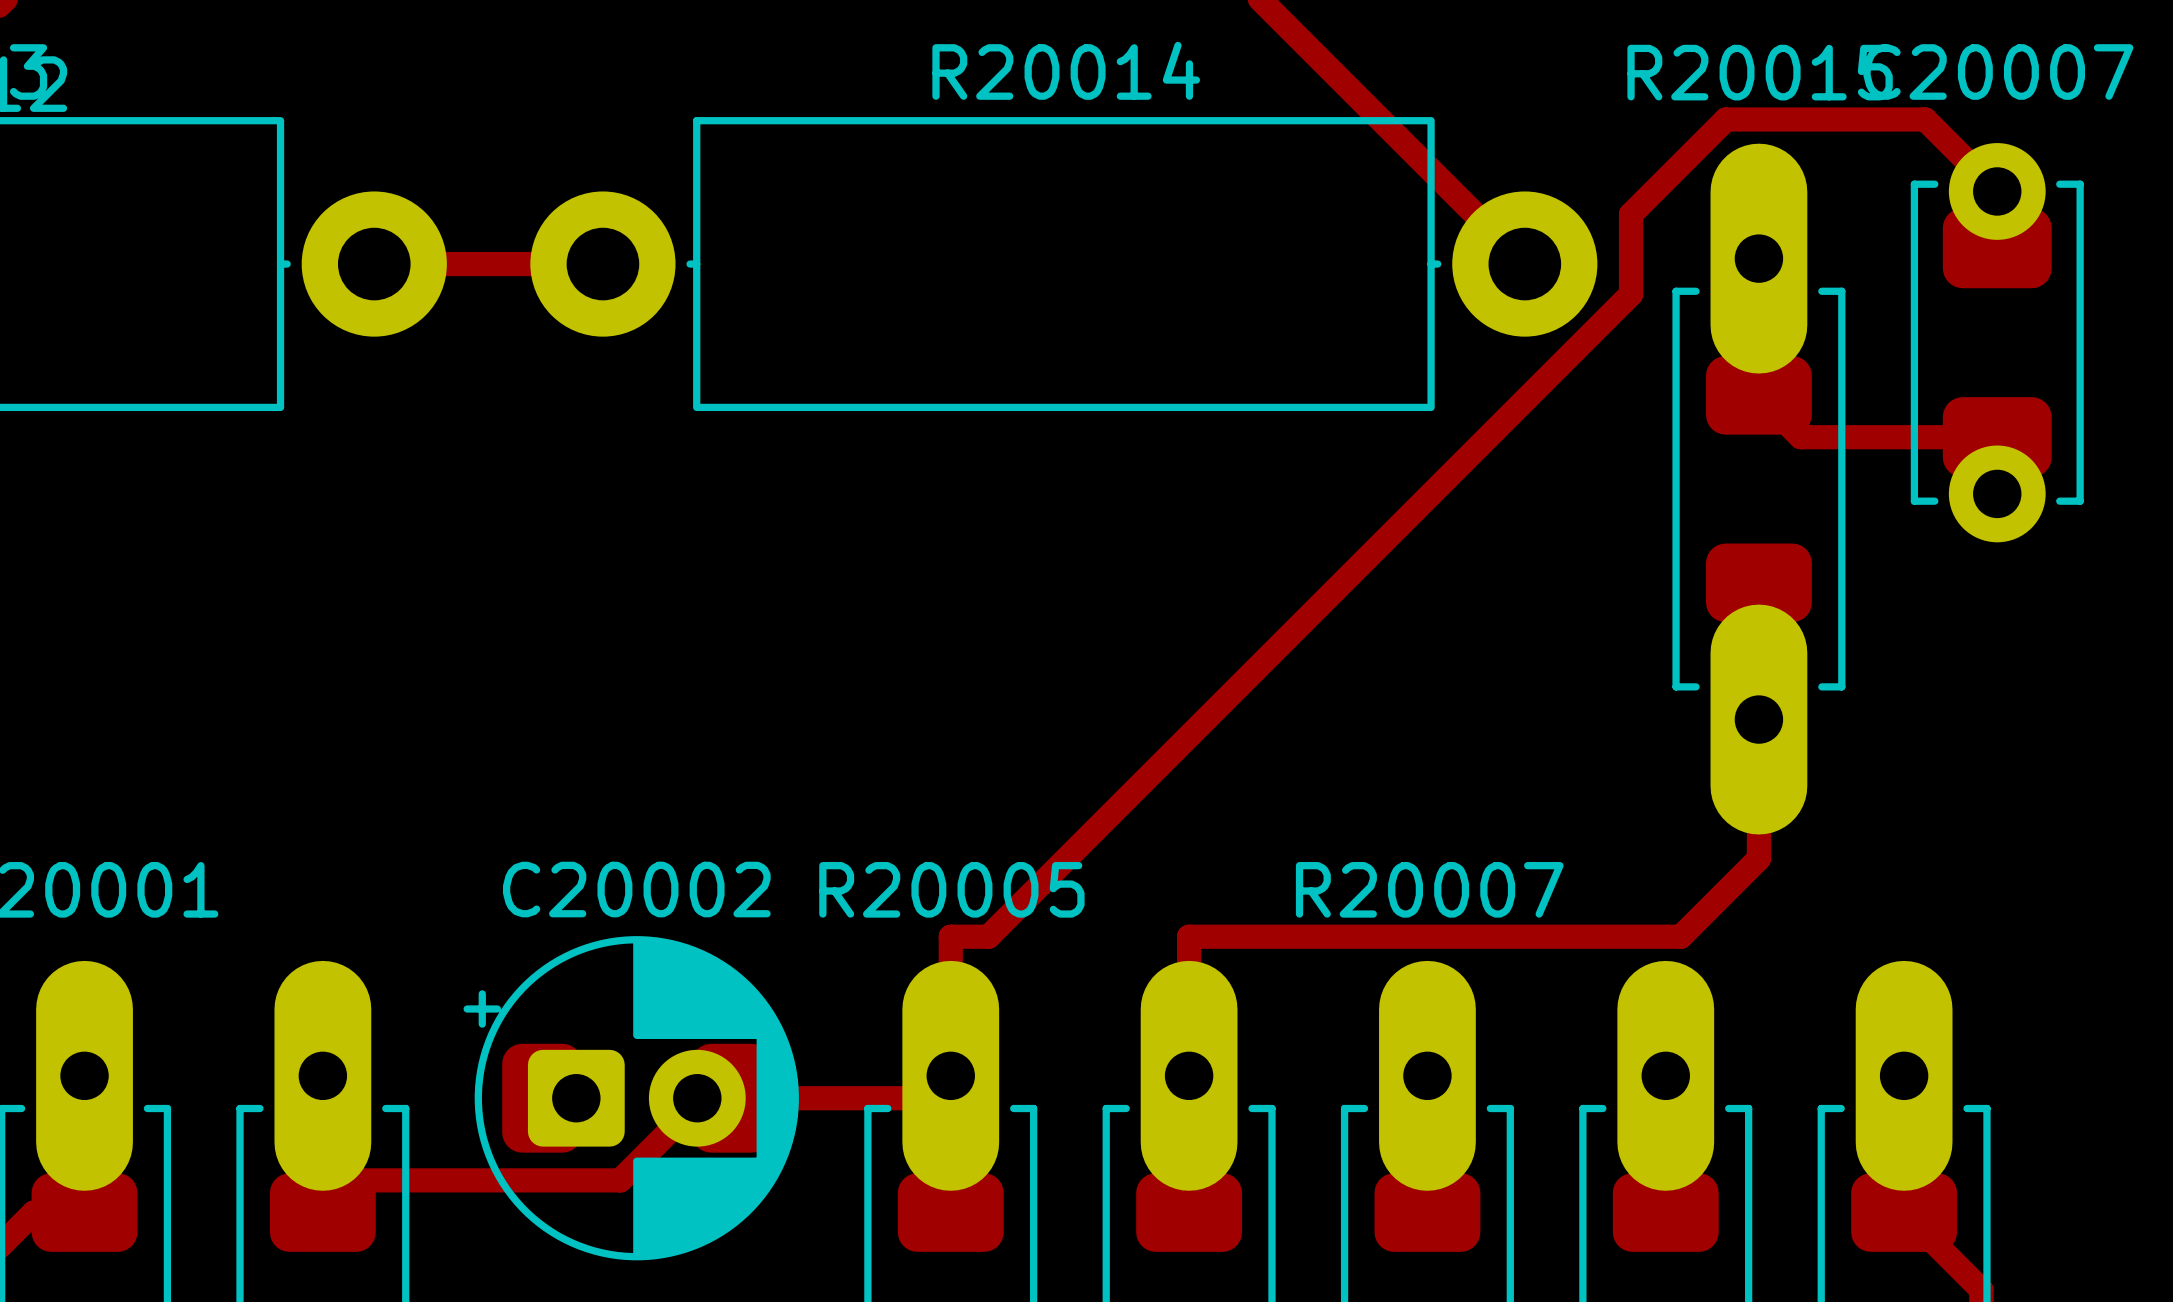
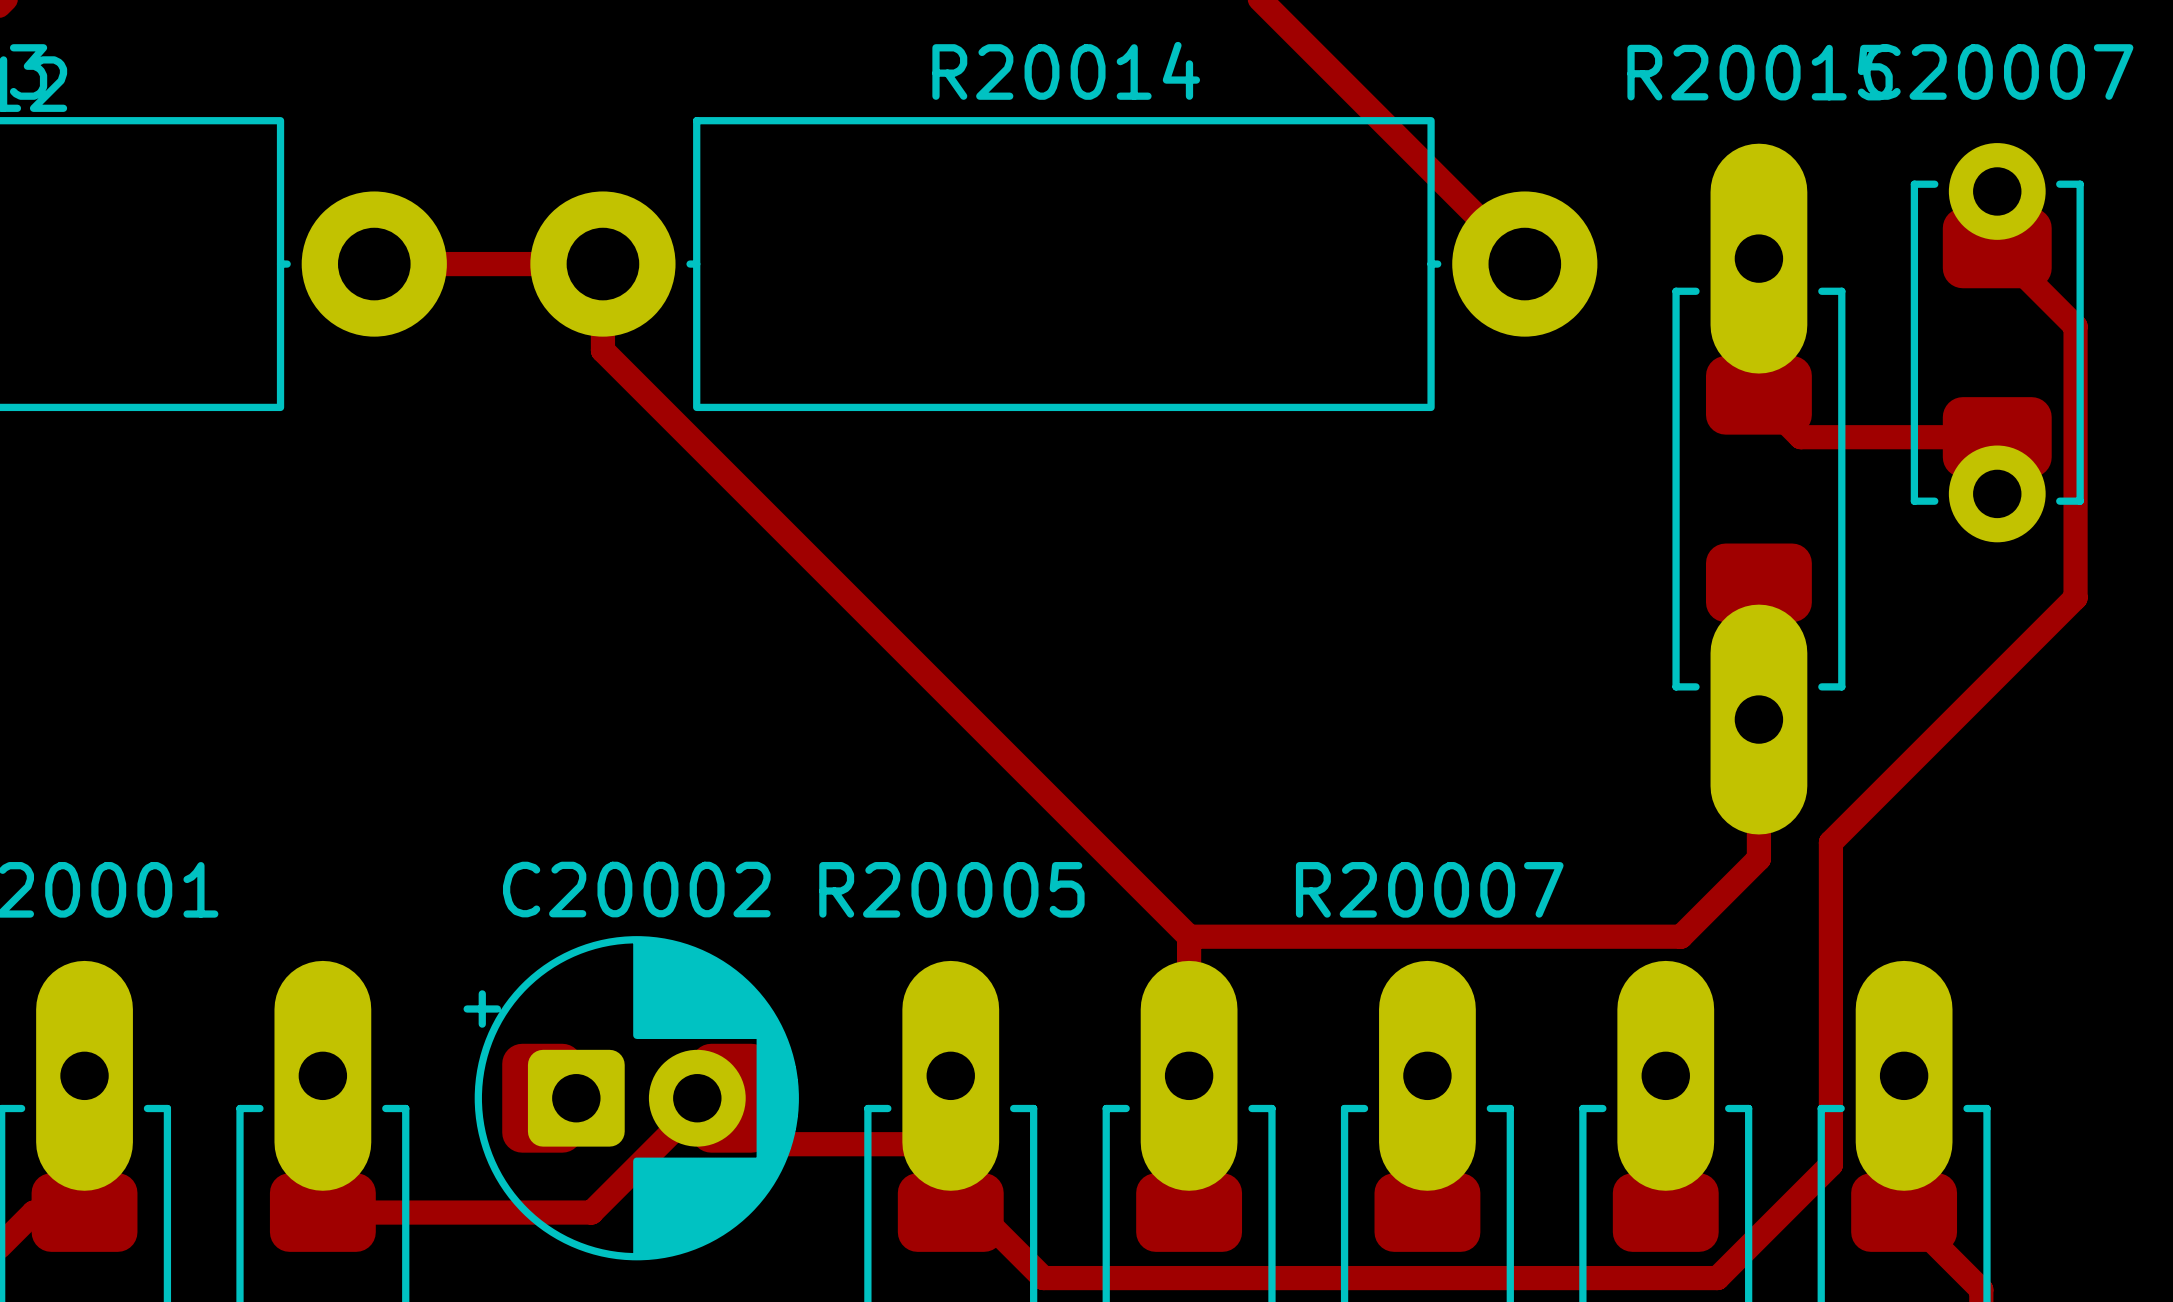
track: (1997, 191) (1925, 119) (1725, 119) (1631, 214) (1631, 294) (988, 936) (950, 936) (950, 1075) -> none
track: none -> (1997, 248) (2075, 326) (2075, 597) (1830, 842) (1830, 1164) (1717, 1278) (1043, 1278) (950, 1185)
track: none -> (602, 264) (602, 350) (1189, 936)
track: (731, 1098) (950, 1098) -> (731, 1098) (777, 1144) (950, 1144)
track: (697, 1103) (620, 1180) (322, 1180) -> (697, 1103) (697, 1106) (591, 1212) (322, 1212)

